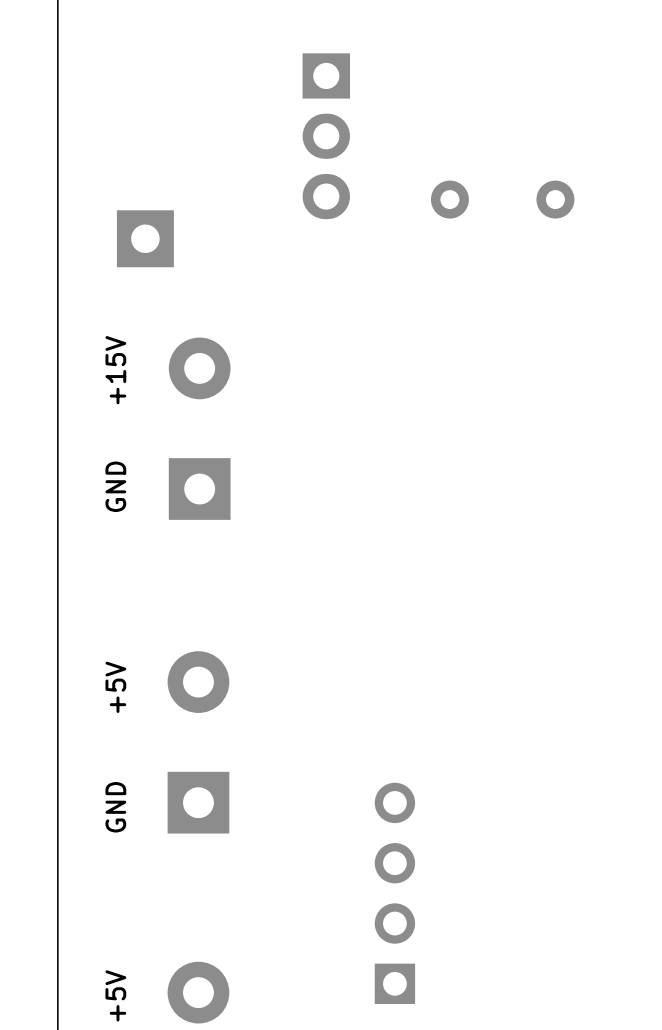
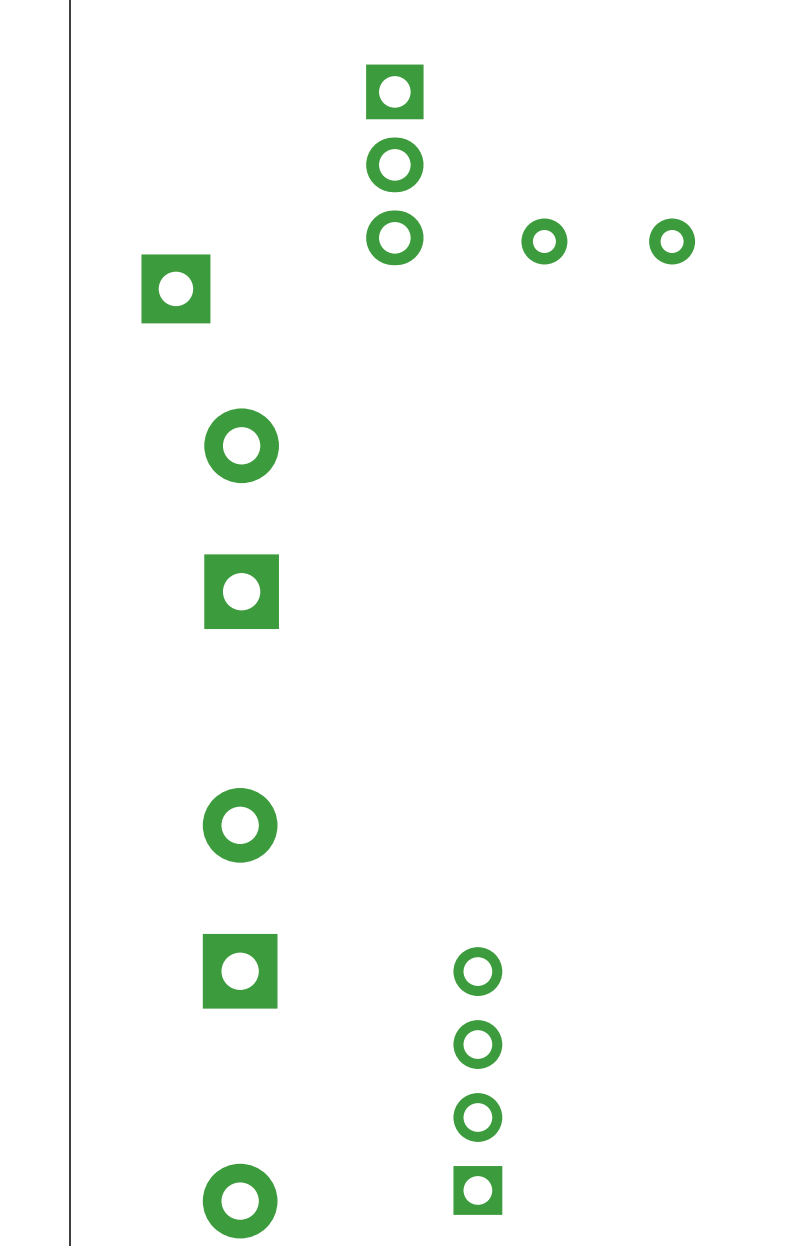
text: +15V (115, 370) -> none
text: GND (115, 486) -> none
text: +5V (115, 687) -> none
text: GND (115, 807) -> none
text: +5V (115, 995) -> none

